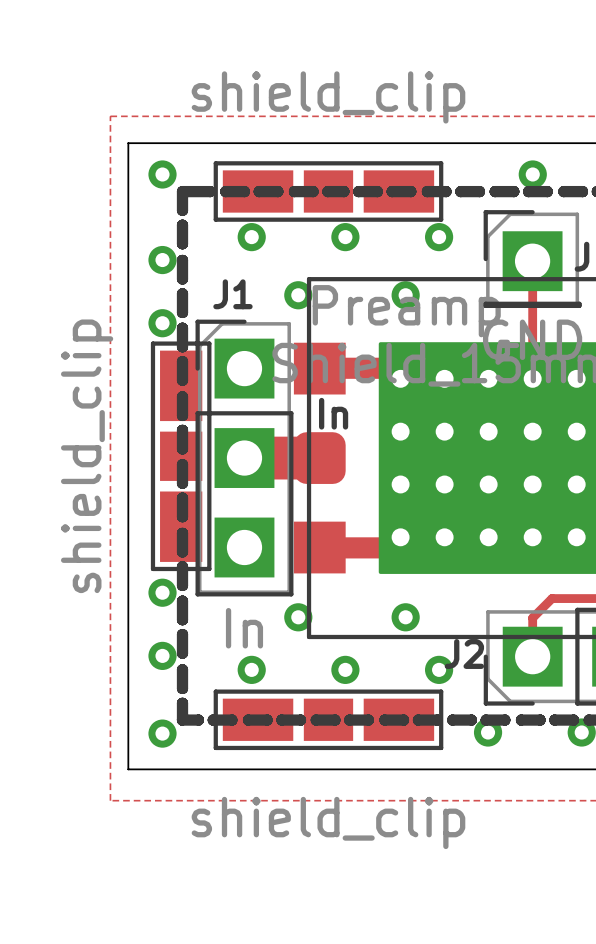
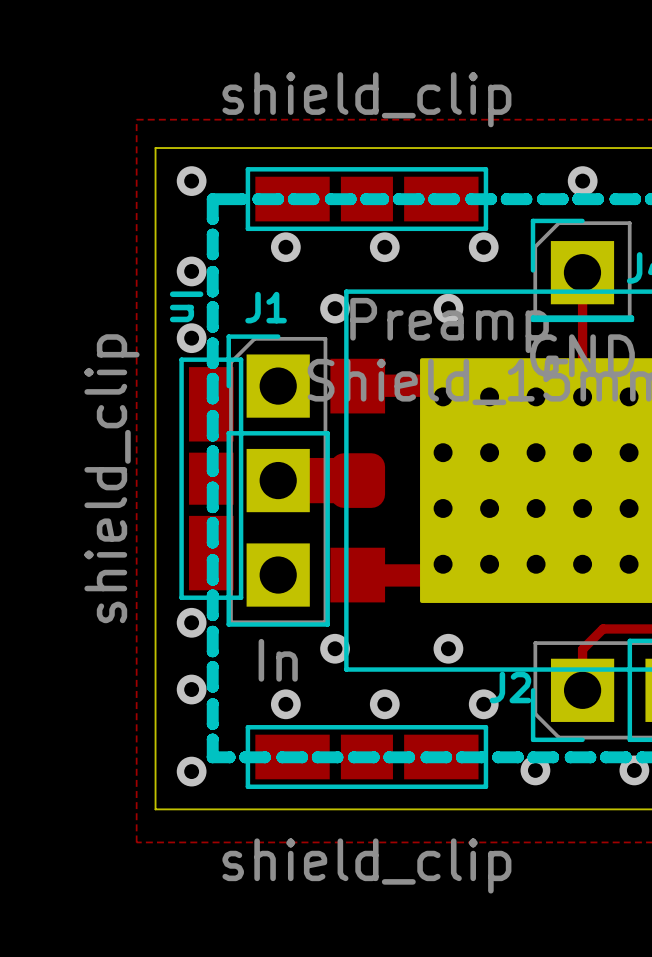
text rotation: 0° (333, 413) -> 90° clockwise (186, 306)
text position: In (333, 413) -> In (186, 306)

